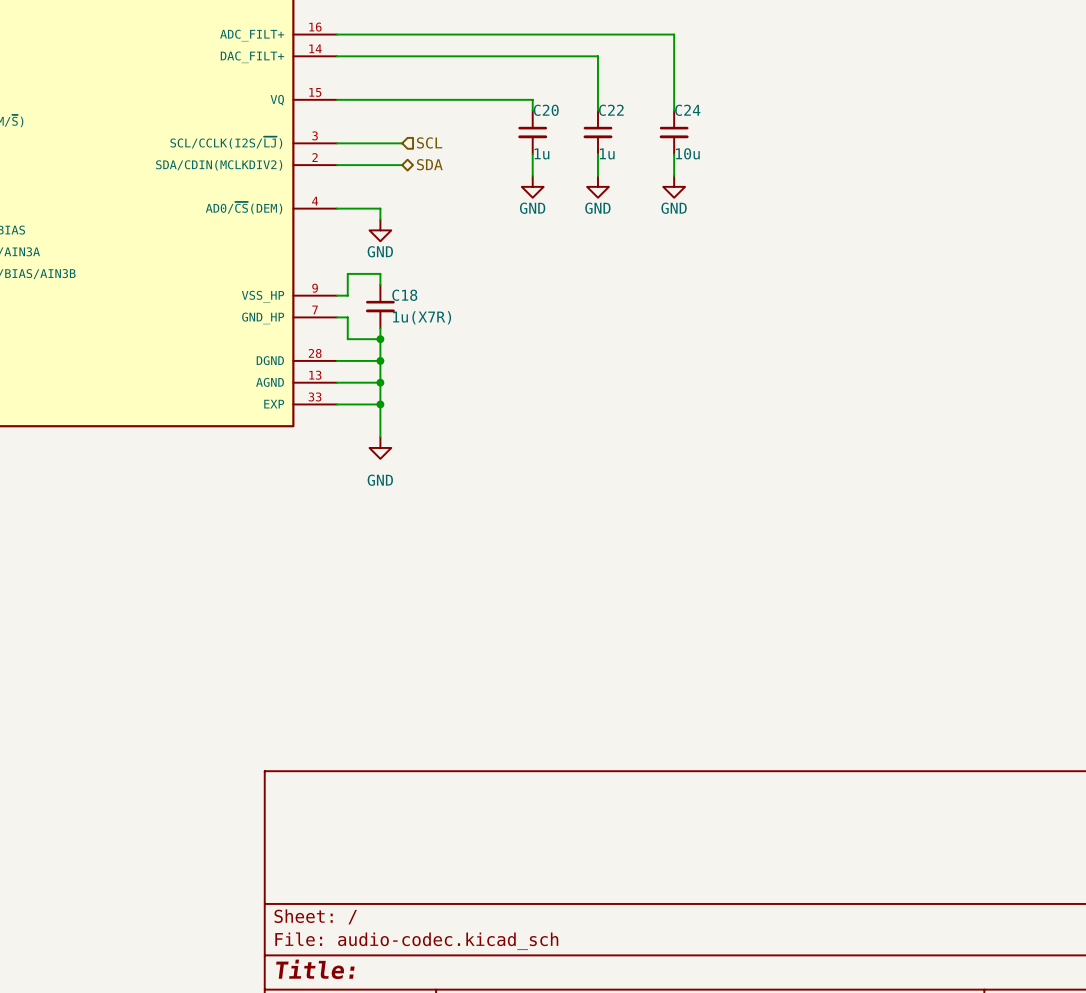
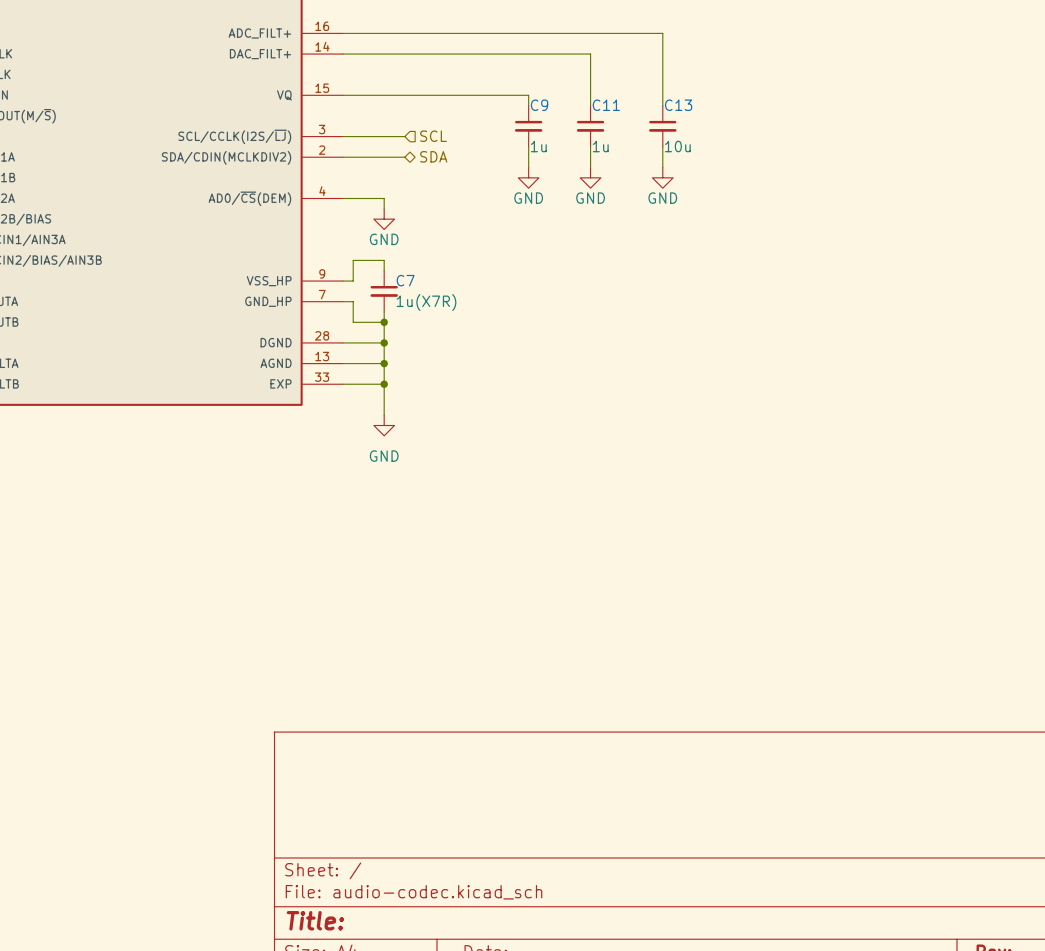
C20 name: C20 (546, 110) -> C9 (539, 105)
C22 name: C22 (611, 110) -> C11 (606, 105)
C24 name: C24 (687, 110) -> C13 (678, 105)
C18 name: C18 (404, 295) -> C7 (405, 280)

